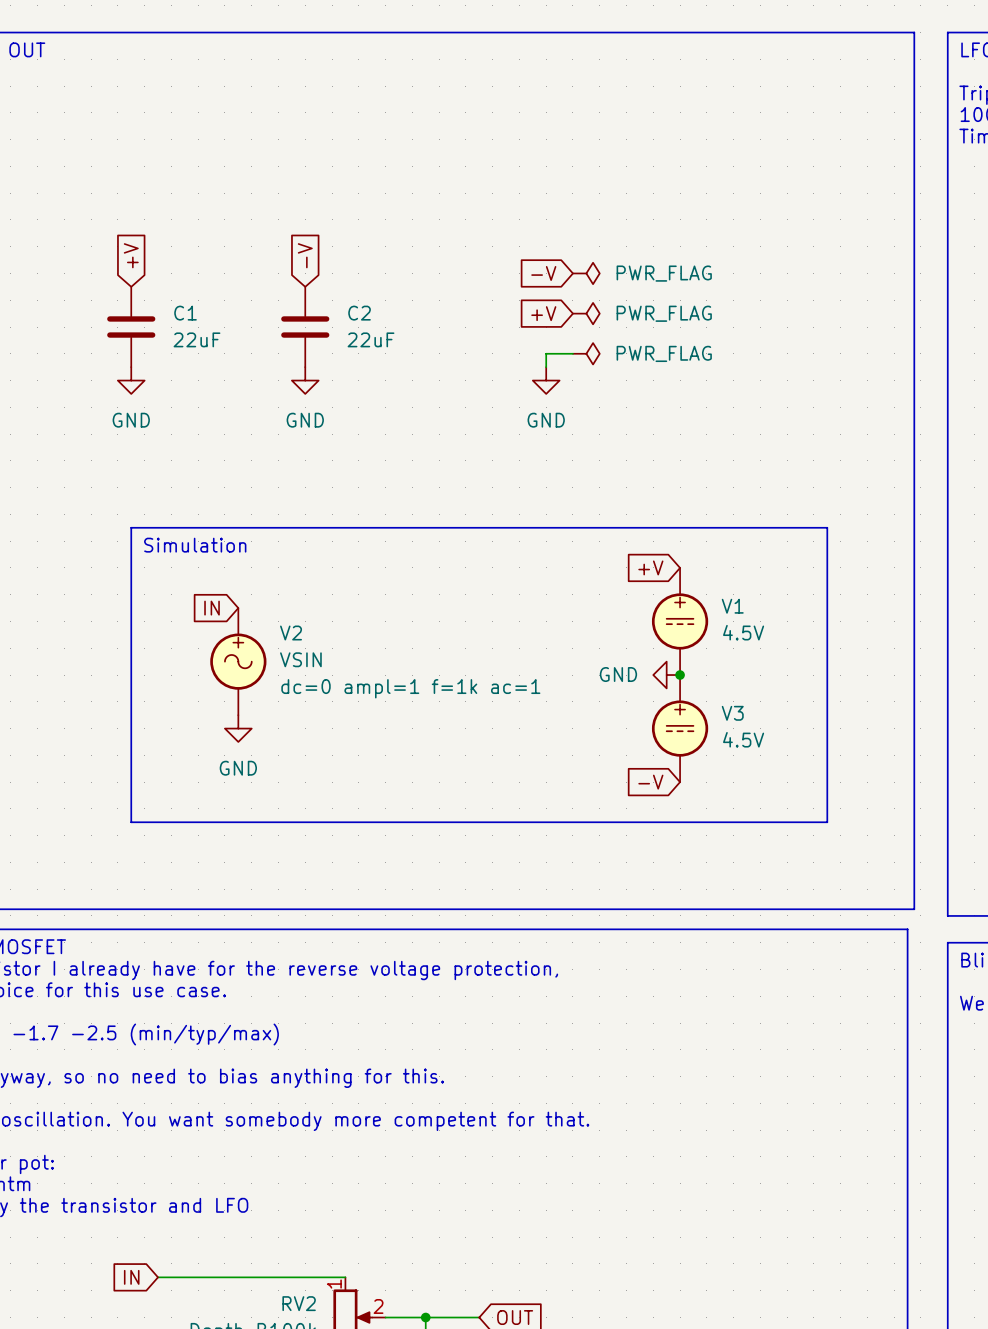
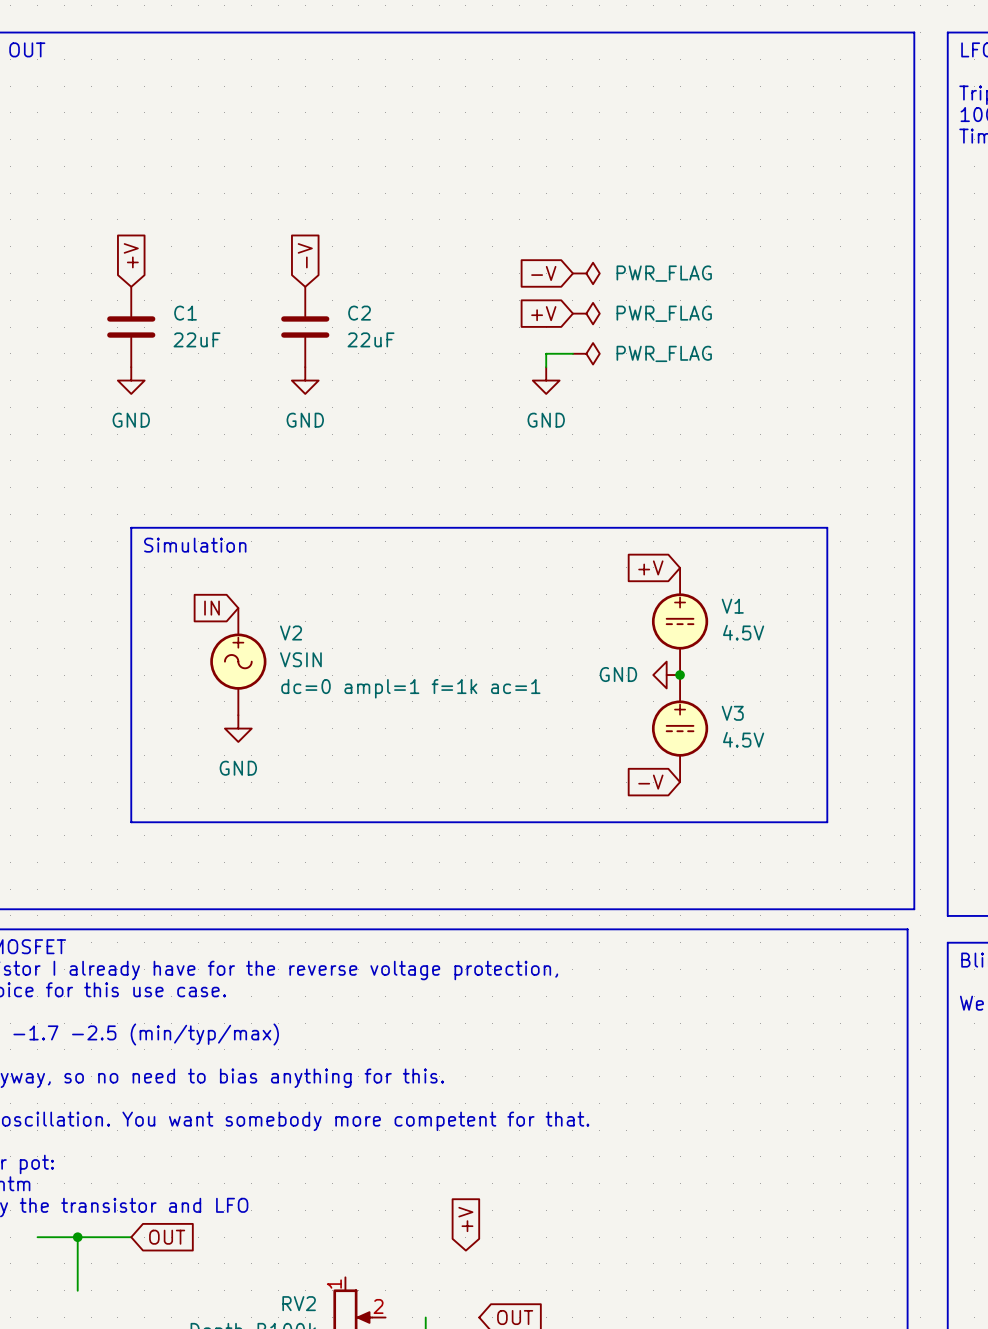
global label: none -> +V (465, 1219)
wire: none -> (37, 1237) (131, 1237)
wire: none -> (77, 1237) (77, 1290)
junction: none -> (77, 1237)
global label: none -> OUT (167, 1237)
global label: IN (131, 1277) -> none
wire: (158, 1277) (345, 1277) -> none
wire: (385, 1317) (479, 1317) -> none
junction: (425, 1317) -> none

